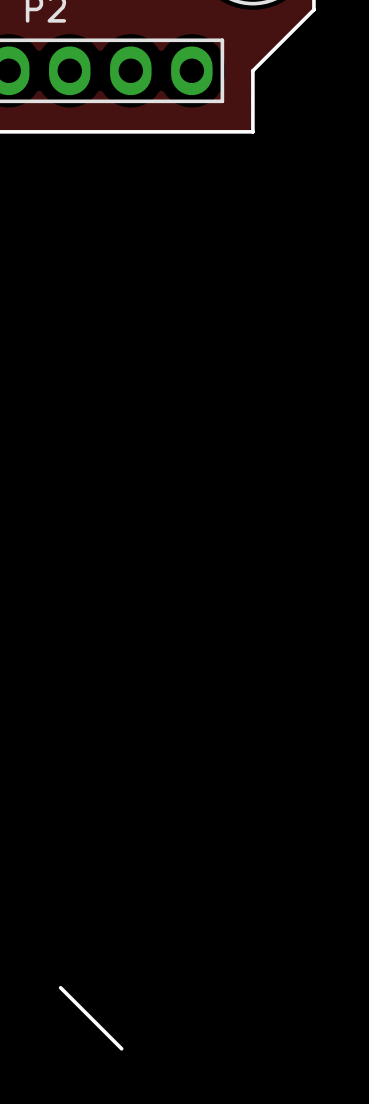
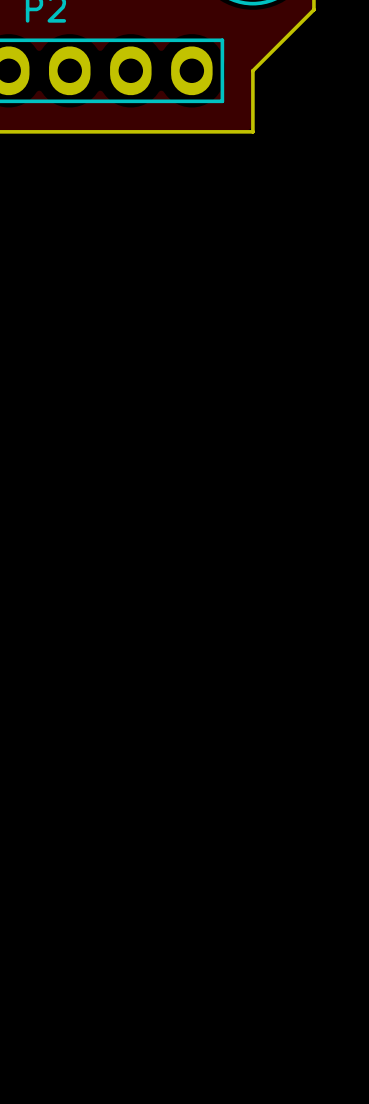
board edge: (60, 987) (121, 1048) -> none

